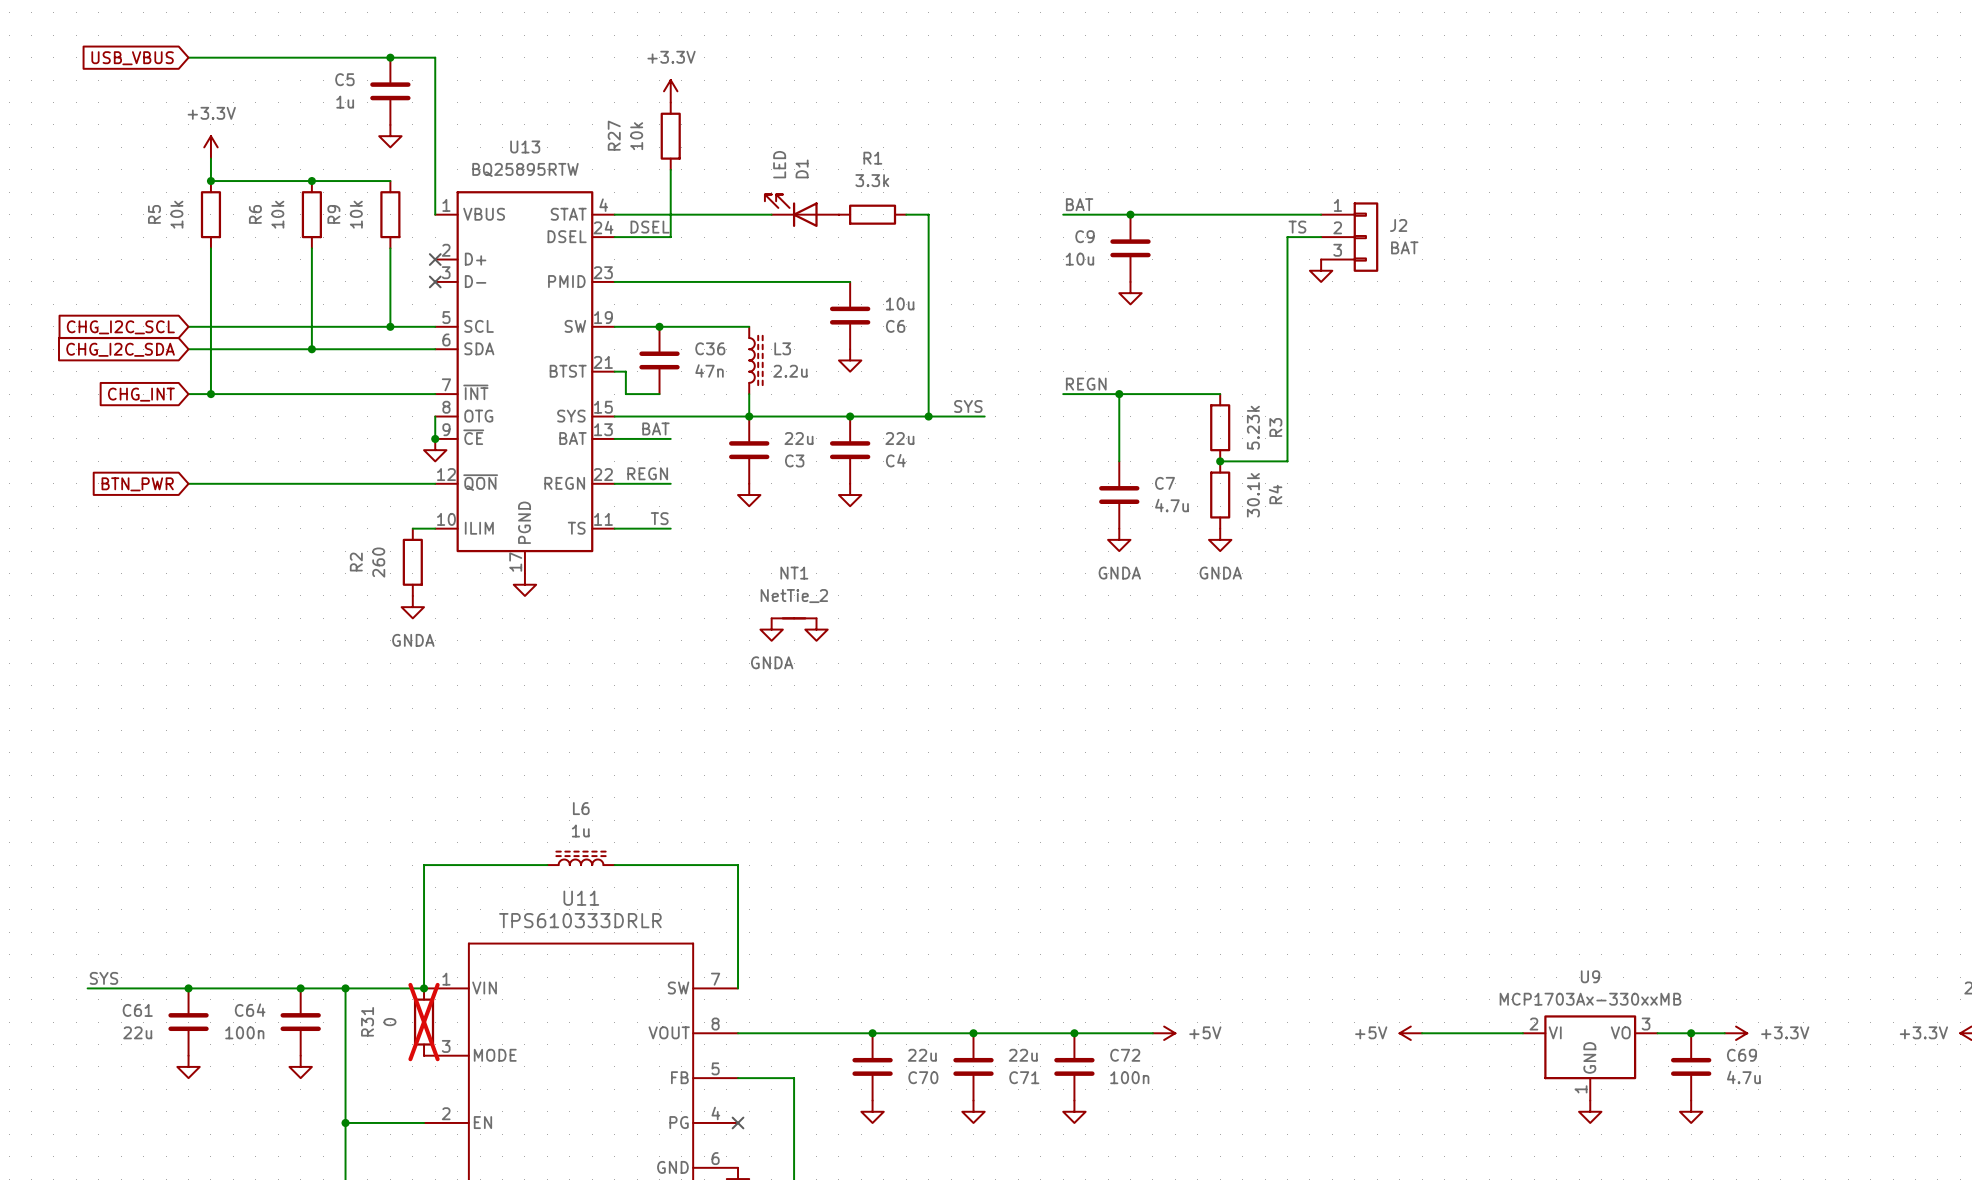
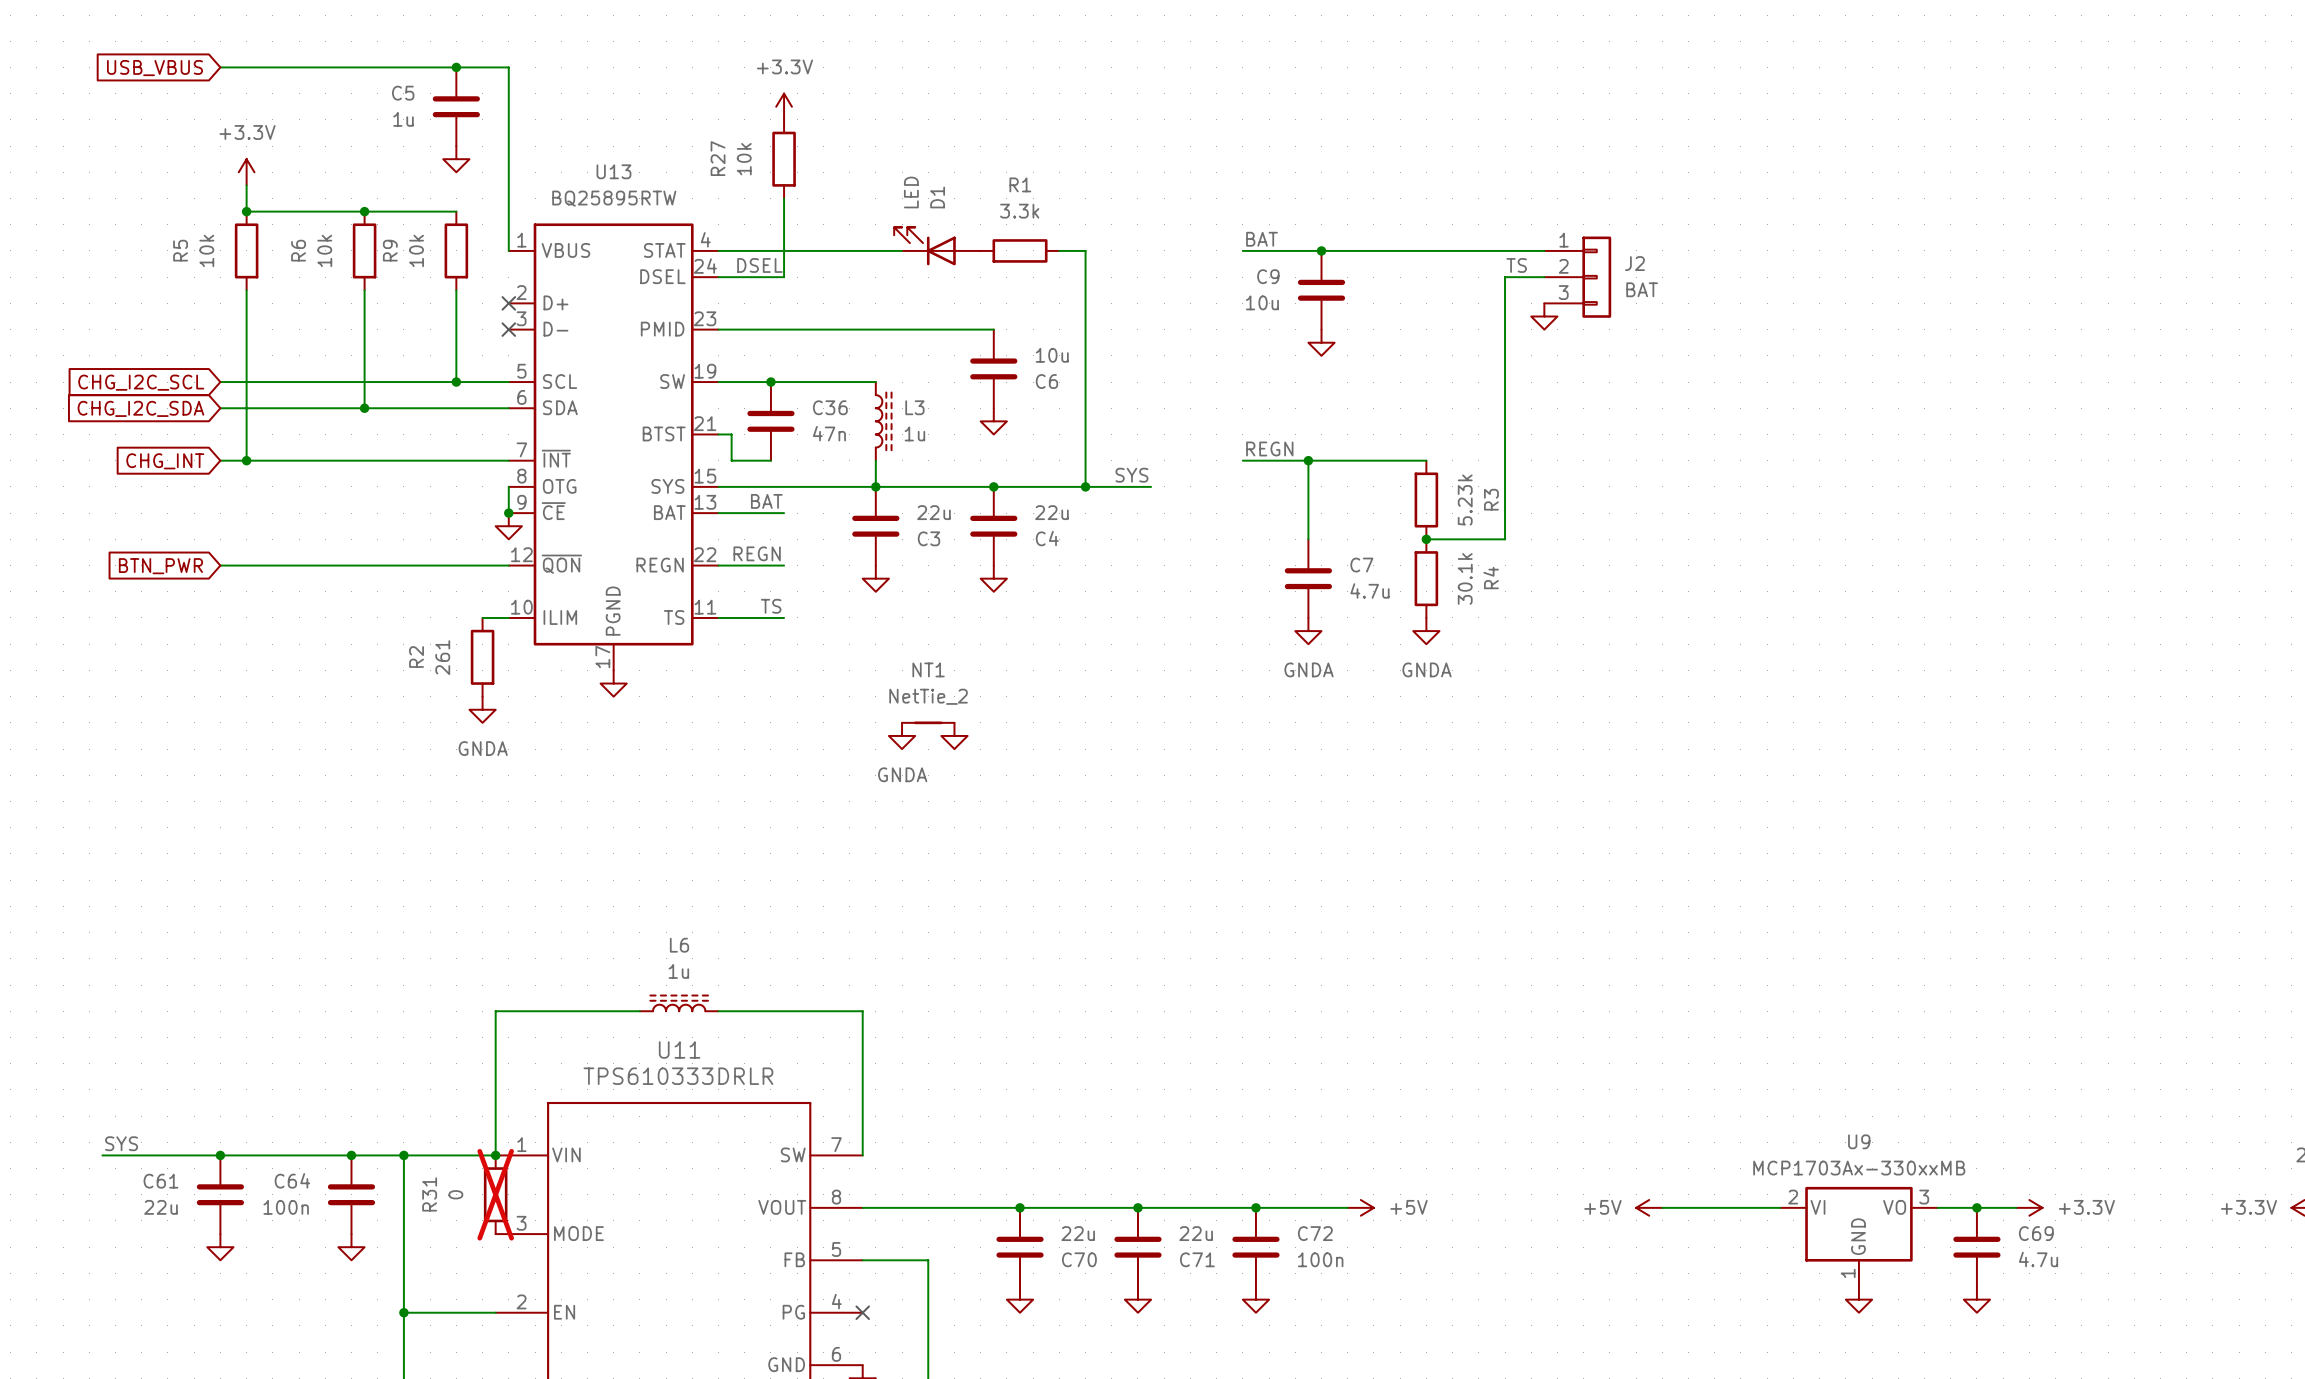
L3 value: 2.2u (790, 371) -> 1u (914, 433)
R2 value: 260 (378, 562) -> 261 (442, 657)

